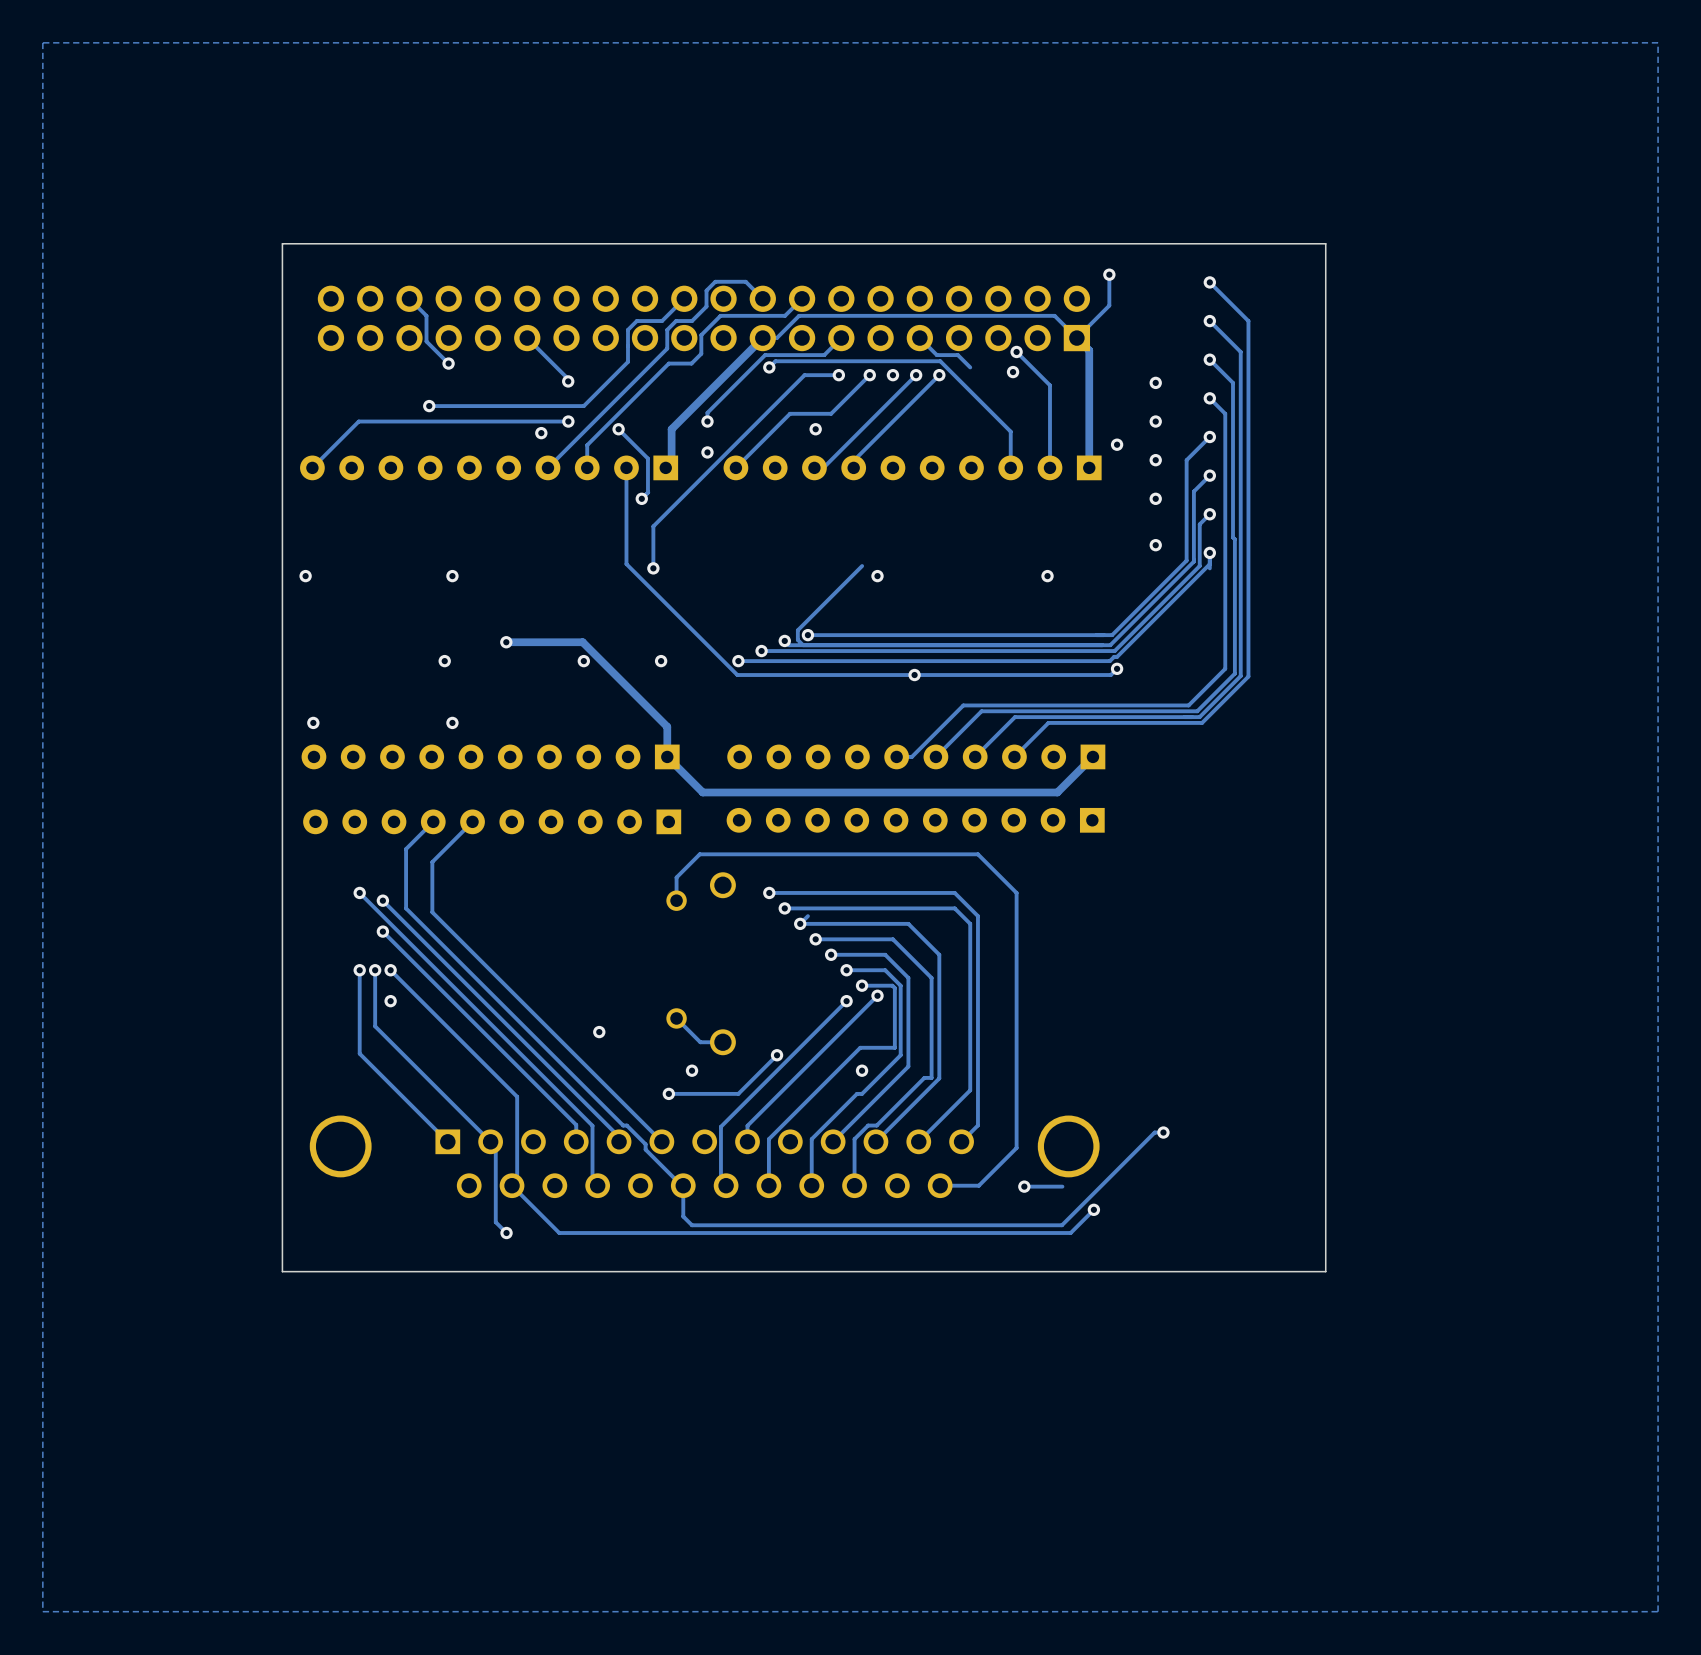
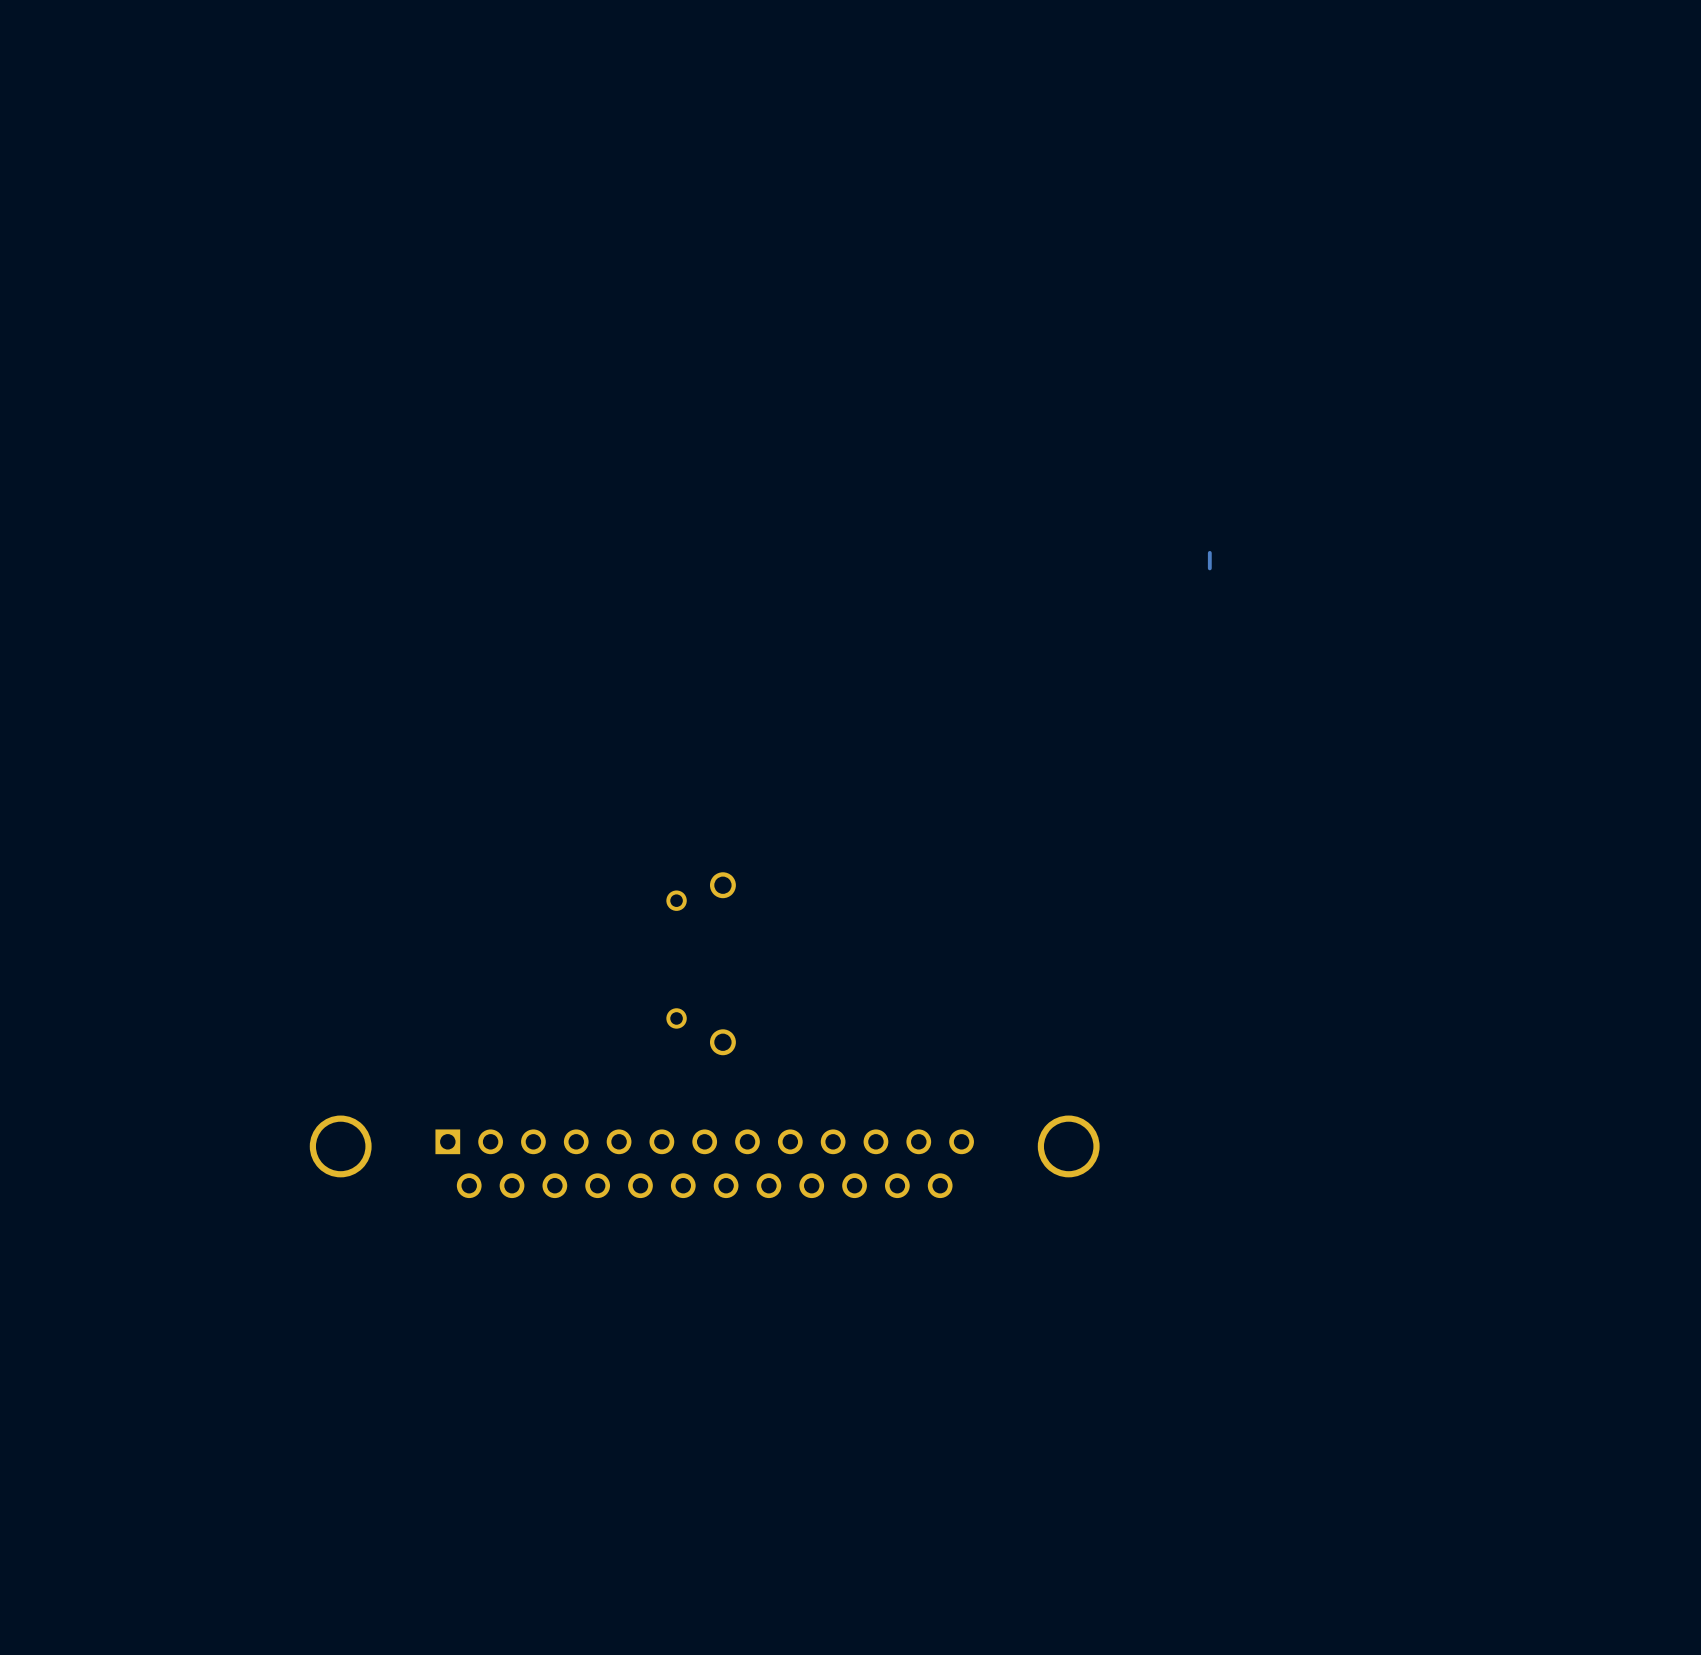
zone outline: (1658, 42) (1658, 1611) (42, 1611) (42, 42) (1658, 42) -> none
board edge: (1325, 243) (1325, 1271) (282, 1271) (282, 243) (1325, 243) -> none
track: (1109, 274) (1109, 305) (1076, 338) -> none
via: (1109, 274) -> none
track: (1209, 282) (1248, 321) (1248, 676) (1202, 722) (1048, 722) (1014, 756) -> none
via: (1209, 282) -> none
track: (409, 298) (426, 315) (426, 341) (448, 363) -> none
track: (684, 298) (662, 321) (636, 321) (628, 329) (628, 361) (583, 406) (429, 406) -> none
track: (762, 298) (745, 281) (715, 281) (706, 290) (706, 306) (692, 321) (676, 321) (667, 329) (667, 348) (547, 467) -> none
track: (802, 298) (785, 315) (720, 315) (701, 335) (701, 353) (691, 363) (668, 363) (587, 445) (587, 467) -> none
part: (703, 318) -> none
track: (1209, 321) (1240, 351) (1240, 676) (1199, 717) (1015, 717) (975, 756) -> none
via: (1209, 321) -> none
track: (527, 338) (568, 379) -> none
track: (841, 338) (824, 355) (765, 355) (707, 412) (707, 421) -> none
track: (919, 338) (936, 355) (957, 355) (970, 367) -> none
track: (1076, 338) (1054, 315) (799, 315) (776, 338) (762, 338) (671, 429) (671, 462) (665, 467) -> none
track: (1076, 338) (1089, 350) (1089, 467) -> none
track: (1016, 351) (1049, 385) (1049, 467) -> none
via: (1016, 351) -> none
track: (1209, 359) (1233, 382) (1234, 673) (1197, 711) (981, 711) (935, 756) -> none
via: (1209, 359) -> none
via: (448, 363) -> none
track: (769, 367) (775, 361) (940, 361) (1010, 431) (1010, 467) -> none
via: (769, 367) -> none
via: (1013, 372) -> none
track: (838, 375) (804, 375) (653, 526) (653, 568) -> none
via: (838, 375) -> none
track: (869, 375) (831, 413) (790, 413) (735, 467) -> none
via: (869, 375) -> none
via: (892, 375) -> none
track: (916, 375) (823, 467) (814, 467) -> none
via: (916, 375) -> none
track: (939, 375) (853, 460) (853, 467) -> none
via: (939, 375) -> none
via: (568, 381) -> none
via: (1155, 382) -> none
track: (1209, 398) (1225, 413) (1225, 668) (1188, 705) (963, 705) (911, 756) (896, 756) -> none
via: (1209, 398) -> none
via: (429, 406) -> none
track: (568, 421) (358, 421) (312, 467) -> none
via: (568, 421) -> none
via: (707, 421) -> none
via: (1155, 421) -> none
track: (618, 429) (647, 458) (647, 492) -> none
via: (618, 429) -> none
via: (815, 429) -> none
via: (541, 433) -> none
track: (1209, 436) (1186, 460) (1186, 560) (1112, 635) (807, 635) -> none
via: (1209, 436) -> none
via: (1117, 444) -> none
via: (707, 452) -> none
via: (1155, 460) -> none
part: (489, 467) -> none
track: (626, 467) (626, 564) (737, 675) (1110, 675) (1117, 668) -> none
part: (912, 467) -> none
track: (1209, 475) (1193, 491) (1193, 561) (1110, 645) (789, 645) (784, 640) -> none
via: (1209, 475) -> none
via: (641, 498) -> none
via: (1155, 498) -> none
track: (1209, 514) (1199, 524) (1199, 566) (1114, 651) (761, 651) -> none
via: (1209, 514) -> none
via: (1155, 545) -> none
via: (1209, 552) -> none
track: (1209, 564) (1117, 656) (1114, 656) (1109, 661) (738, 661) -> none
track: (862, 566) (797, 630) (797, 639) (803, 645) -> none
via: (653, 568) -> none
via: (305, 576) -> none
via: (452, 576) -> none
via: (877, 576) -> none
via: (1047, 576) -> none
via: (807, 635) -> none
via: (784, 640) -> none
track: (506, 642) (582, 642) (667, 726) (667, 756) (702, 792) (1057, 792) (1092, 756) -> none
via: (506, 642) -> none
via: (761, 651) -> none
via: (444, 661) -> none
via: (583, 661) -> none
via: (661, 661) -> none
via: (738, 661) -> none
via: (1117, 668) -> none
via: (914, 675) -> none
via: (313, 722) -> none
via: (452, 722) -> none
part: (490, 756) -> none
part: (916, 756) -> none
part: (915, 820) -> none
track: (433, 821) (406, 849) (406, 908) (623, 1125) (626, 1125) (645, 1144) (645, 1149) (683, 1185) -> none
track: (472, 821) (432, 862) (432, 912) (661, 1141) -> none
part: (492, 821) -> none
track: (359, 892) (592, 1125) (592, 1180) (597, 1185) -> none
via: (359, 892) -> none
track: (769, 892) (954, 892) (977, 916) (977, 1125) (961, 1141) -> none
via: (769, 892) -> none
track: (382, 900) (619, 1136) (619, 1141) -> none
via: (382, 900) -> none
track: (676, 900) (676, 877) (699, 854) (977, 854) (1016, 892) (1016, 1147) (978, 1185) (940, 1185) -> none
track: (784, 908) (954, 908) (970, 923) (970, 1090) (918, 1141) -> none
via: (784, 908) -> none
track: (807, 916) (800, 923) (908, 923) (939, 954) (939, 1078) (875, 1141) -> none
via: (800, 923) -> none
track: (382, 931) (576, 1124) (576, 1141) -> none
via: (382, 931) -> none
track: (815, 939) (892, 939) (931, 977) (931, 1077) (924, 1077) (876, 1125) (868, 1125) (854, 1139) (854, 1185) -> none
via: (815, 939) -> none
track: (831, 954) (885, 954) (908, 977) (908, 1066) (833, 1141) -> none
via: (831, 954) -> none
track: (359, 970) (359, 1053) (447, 1141) -> none
via: (359, 970) -> none
track: (375, 970) (375, 1026) (495, 1146) (495, 1222) (506, 1233) -> none
via: (375, 970) -> none
track: (390, 970) (517, 1096) (517, 1180) (512, 1185) (559, 1233) (1070, 1233) (1093, 1209) -> none
via: (390, 970) -> none
track: (846, 970) (885, 970) (900, 985) (900, 1055) (862, 1093) (856, 1093) (811, 1139) (811, 1185) -> none
via: (846, 970) -> none
track: (862, 985) (892, 985) (894, 988) (894, 1047) (860, 1047) (768, 1139) (768, 1185) -> none
via: (862, 985) -> none
track: (877, 995) (747, 1125) (747, 1141) -> none
via: (877, 995) -> none
via: (390, 1001) -> none
track: (846, 1001) (720, 1126) (720, 1180) (726, 1185) -> none
via: (846, 1001) -> none
track: (676, 1018) (700, 1042) (722, 1042) -> none
via: (599, 1032) -> none
track: (777, 1055) (738, 1093) (668, 1093) -> none
via: (777, 1055) -> none
via: (692, 1070) -> none
via: (862, 1070) -> none
via: (668, 1093) -> none
track: (1163, 1132) (1154, 1132) (1061, 1225) (692, 1225) (683, 1216) (683, 1185) -> none
via: (1163, 1132) -> none
via: (1024, 1186) -> none
track: (1062, 1186) (1024, 1186) -> none
via: (1093, 1209) -> none
via: (506, 1233) -> none

